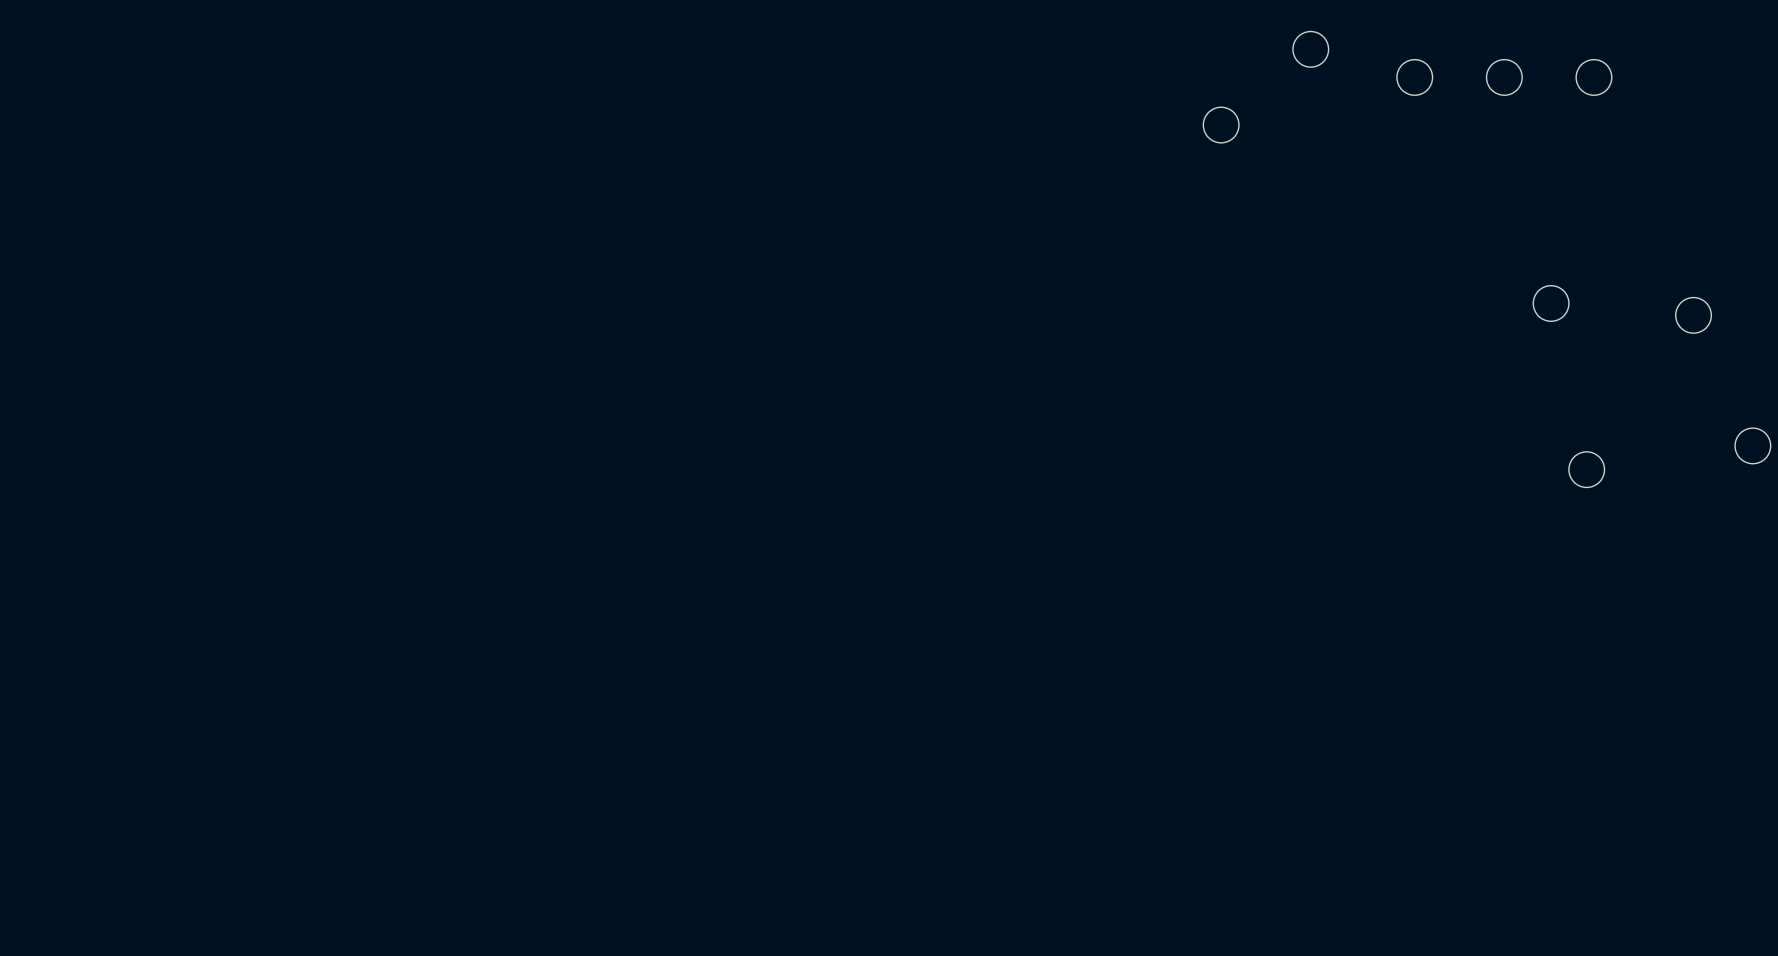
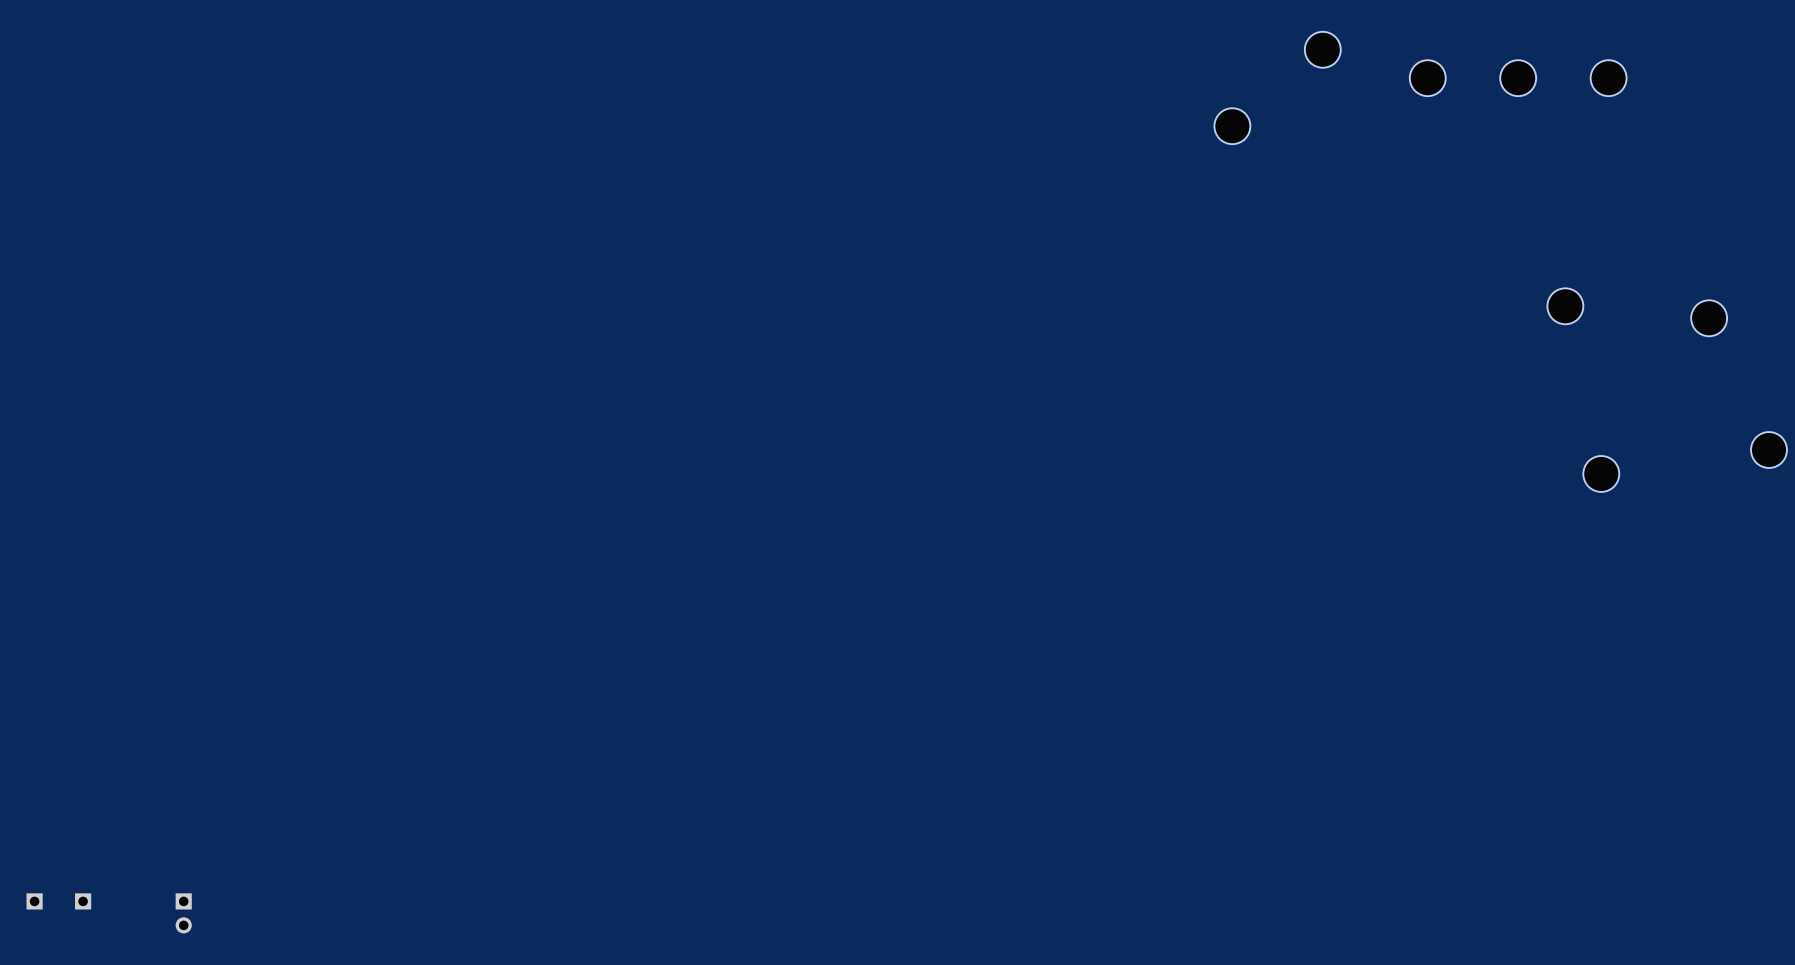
part: none -> (34, 901)
part: none -> (83, 901)
part: none -> (183, 913)

